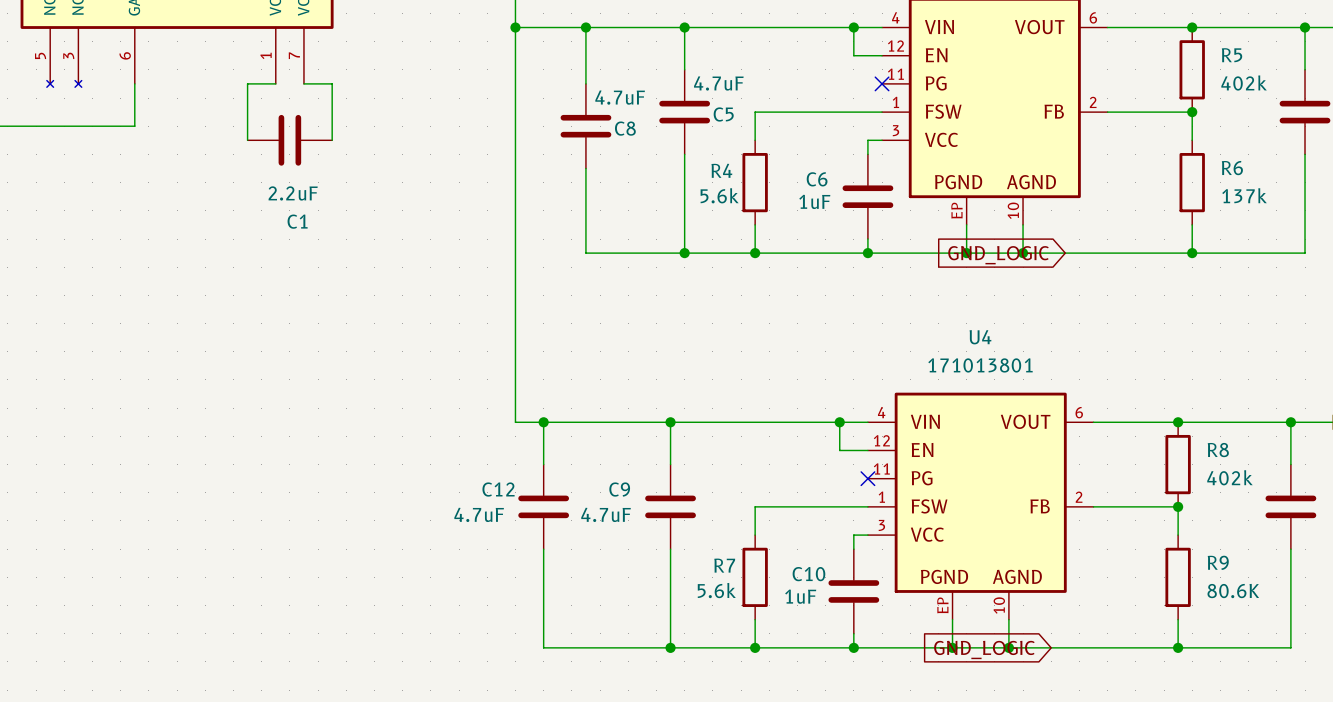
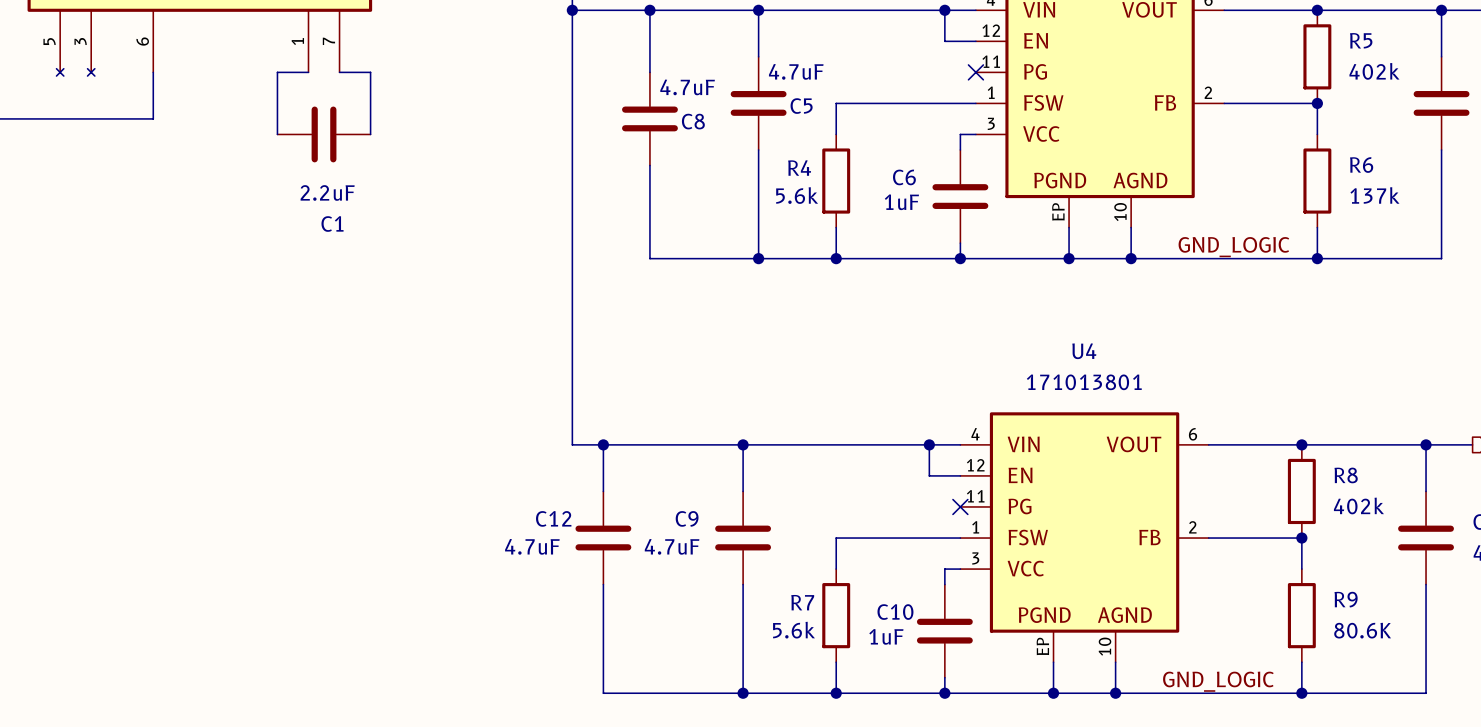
label: none -> GND_LOGIC (1233, 247)
global label: GND_LOGIC (998, 255) -> none
label: none -> GND_LOGIC (1218, 681)
global label: GND_LOGIC (984, 649) -> none

